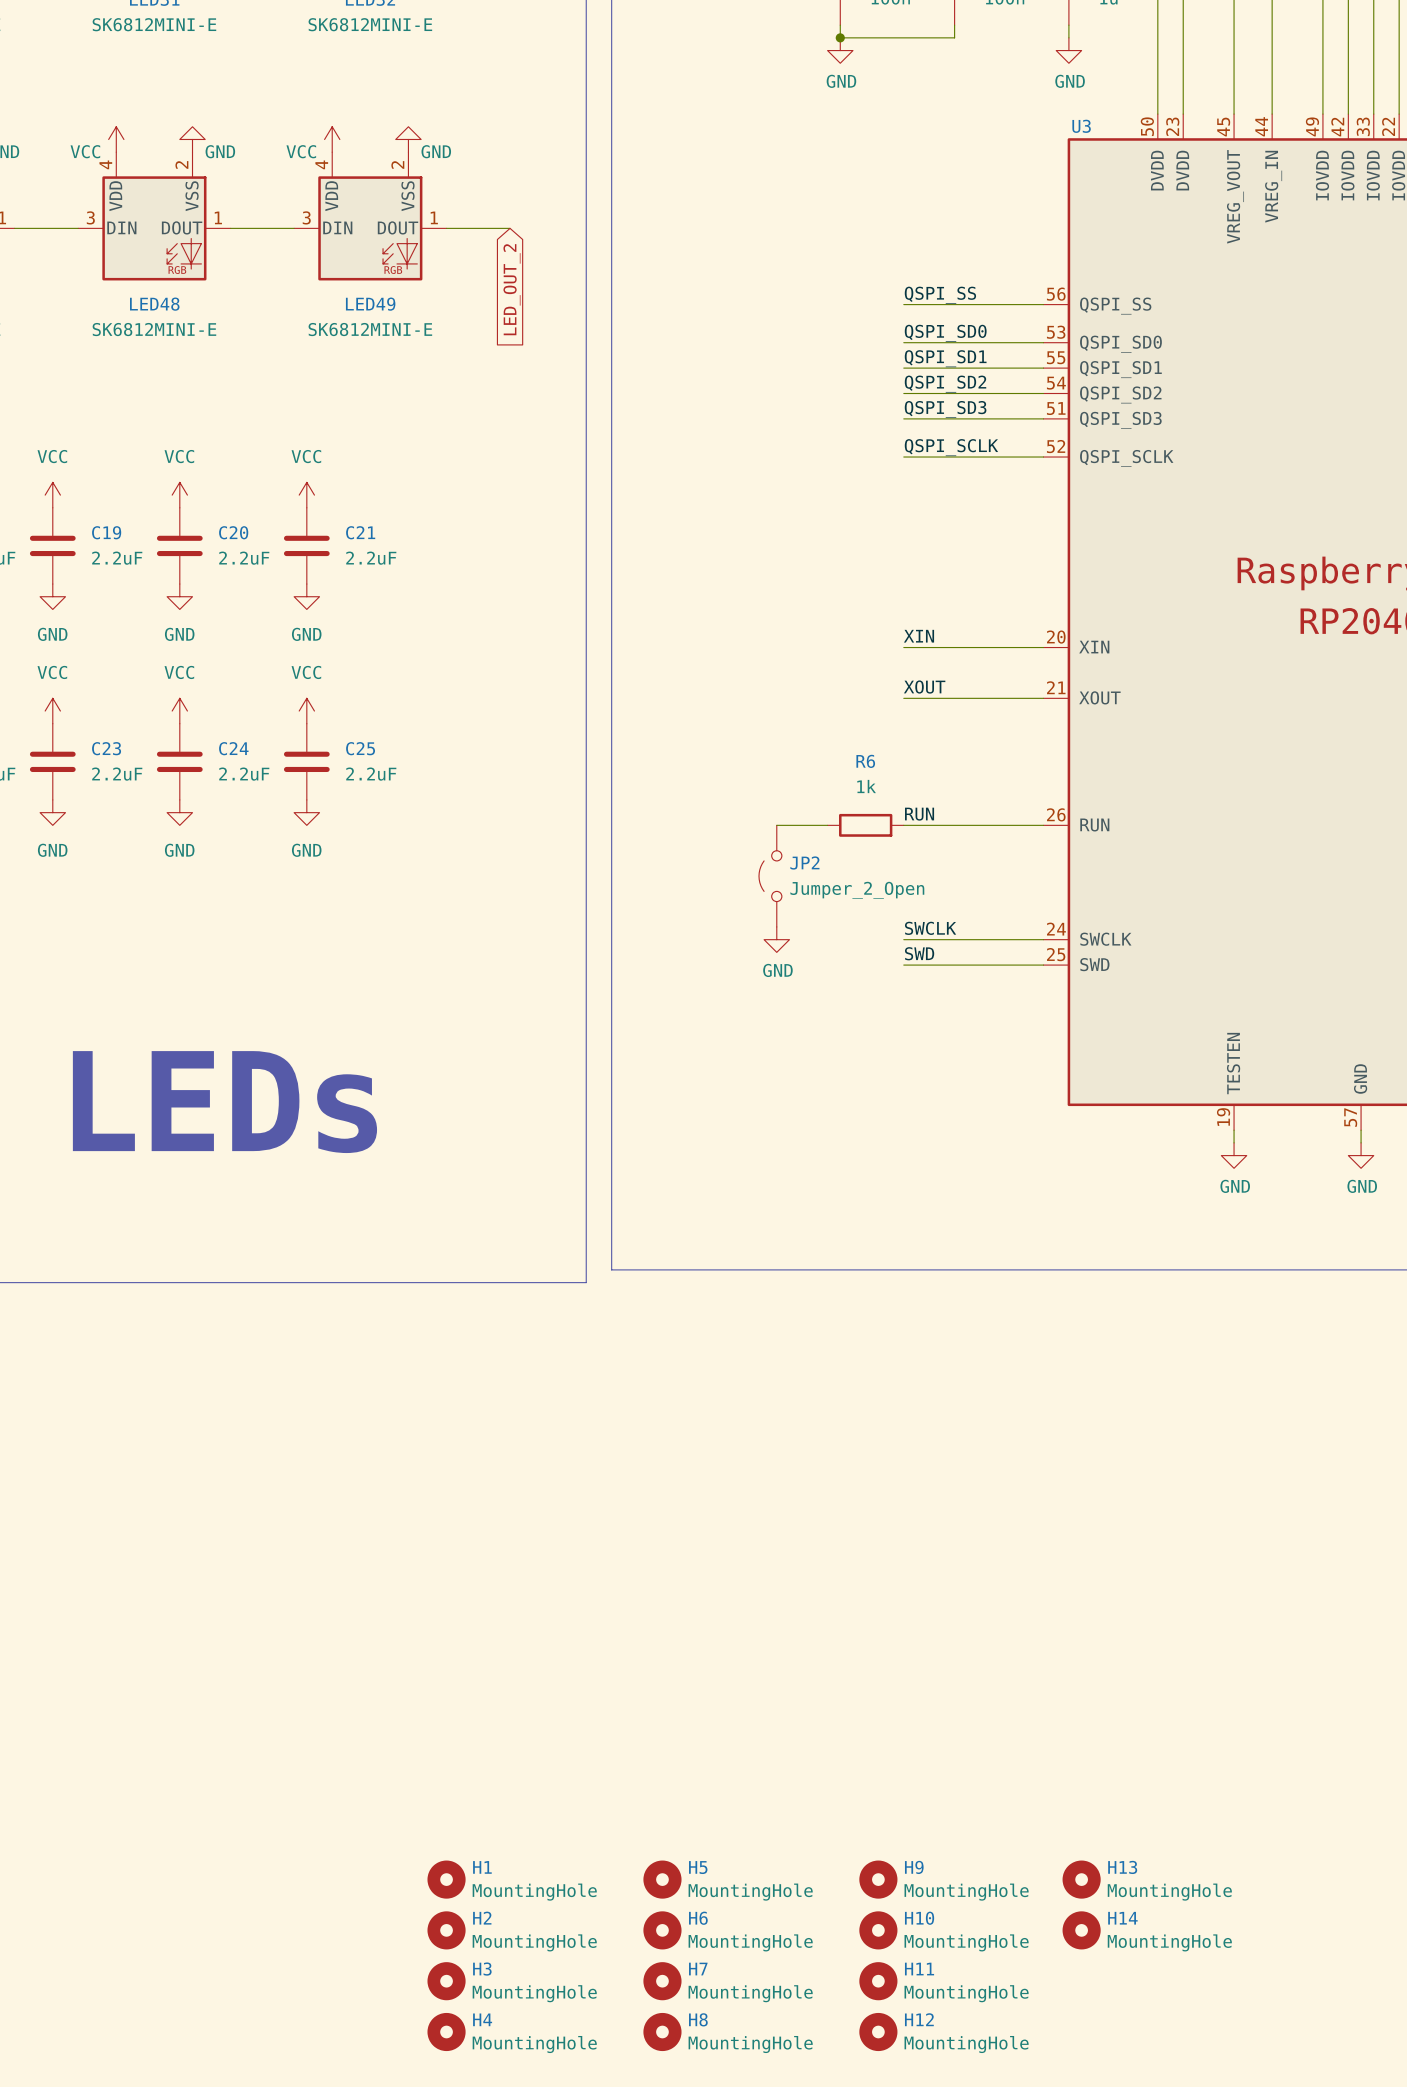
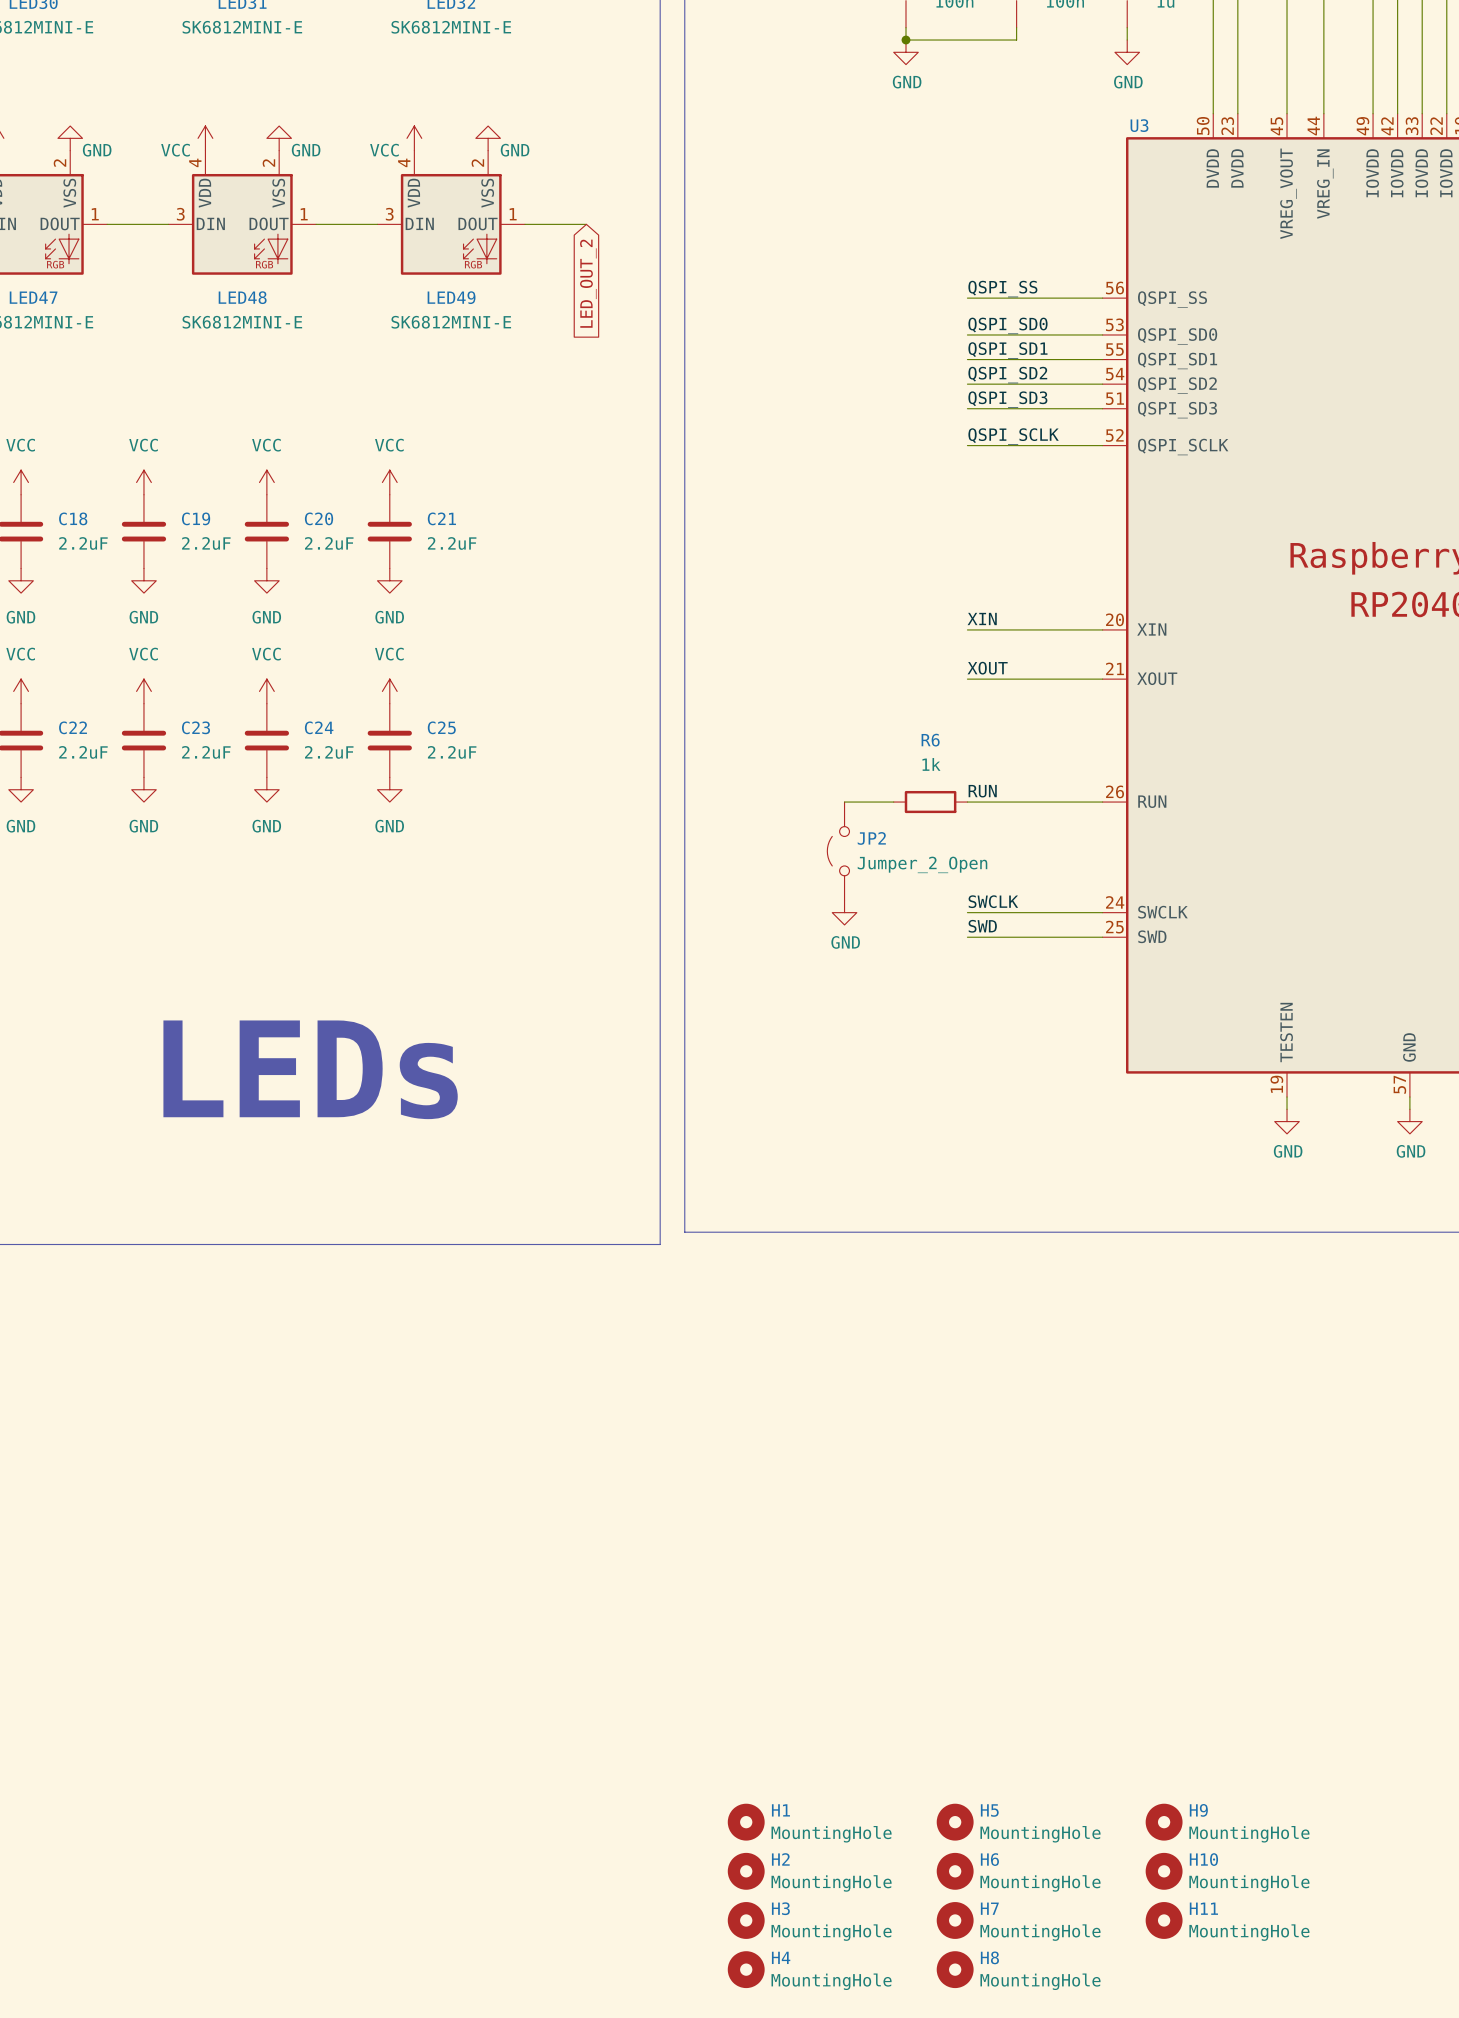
H1 position: (446, 1879) -> (746, 1822)
H5 position: (662, 1879) -> (955, 1822)
H9 position: (878, 1879) -> (1164, 1822)
H13: MountingHole (1081, 1879) -> none
H2 position: (446, 1930) -> (746, 1871)
H6 position: (662, 1930) -> (955, 1871)
H10 position: (878, 1930) -> (1164, 1871)
H14: MountingHole (1081, 1930) -> none
H3 position: (446, 1981) -> (746, 1920)
H7 position: (662, 1981) -> (955, 1920)
H11 position: (878, 1981) -> (1164, 1920)
H4 position: (446, 2032) -> (746, 1969)
H8 position: (662, 2032) -> (955, 1969)
H12: MountingHole (878, 2032) -> none

